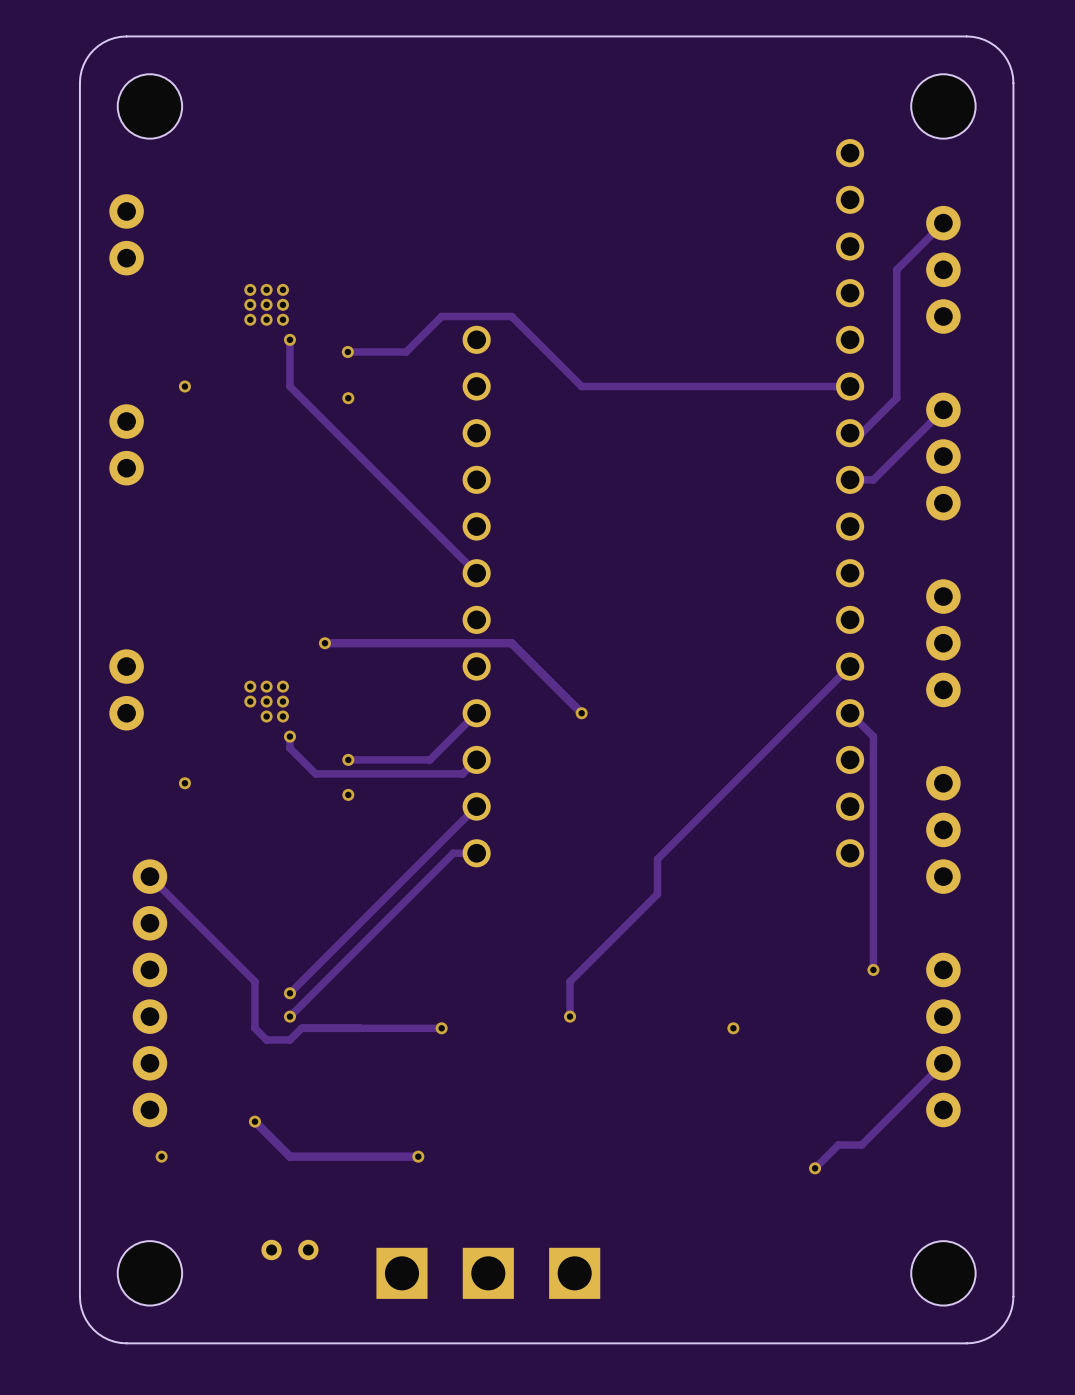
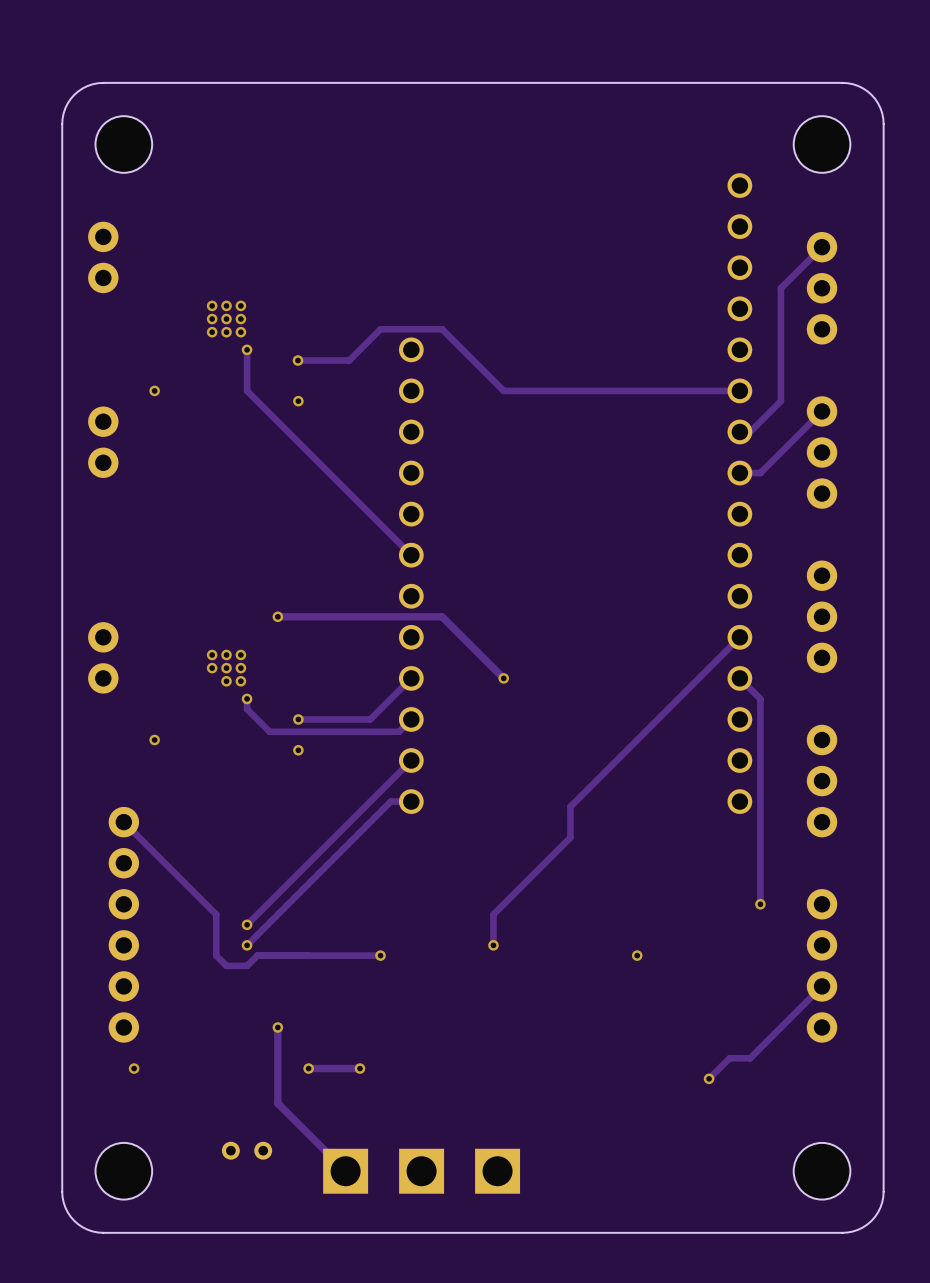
track: none -> (277, 1027) (277, 1103) (345, 1171)
via: none -> (277, 1027)
track: (254, 1121) (289, 1156) (359, 1156) -> none
via: (254, 1121) -> none
via: none -> (308, 1068)

